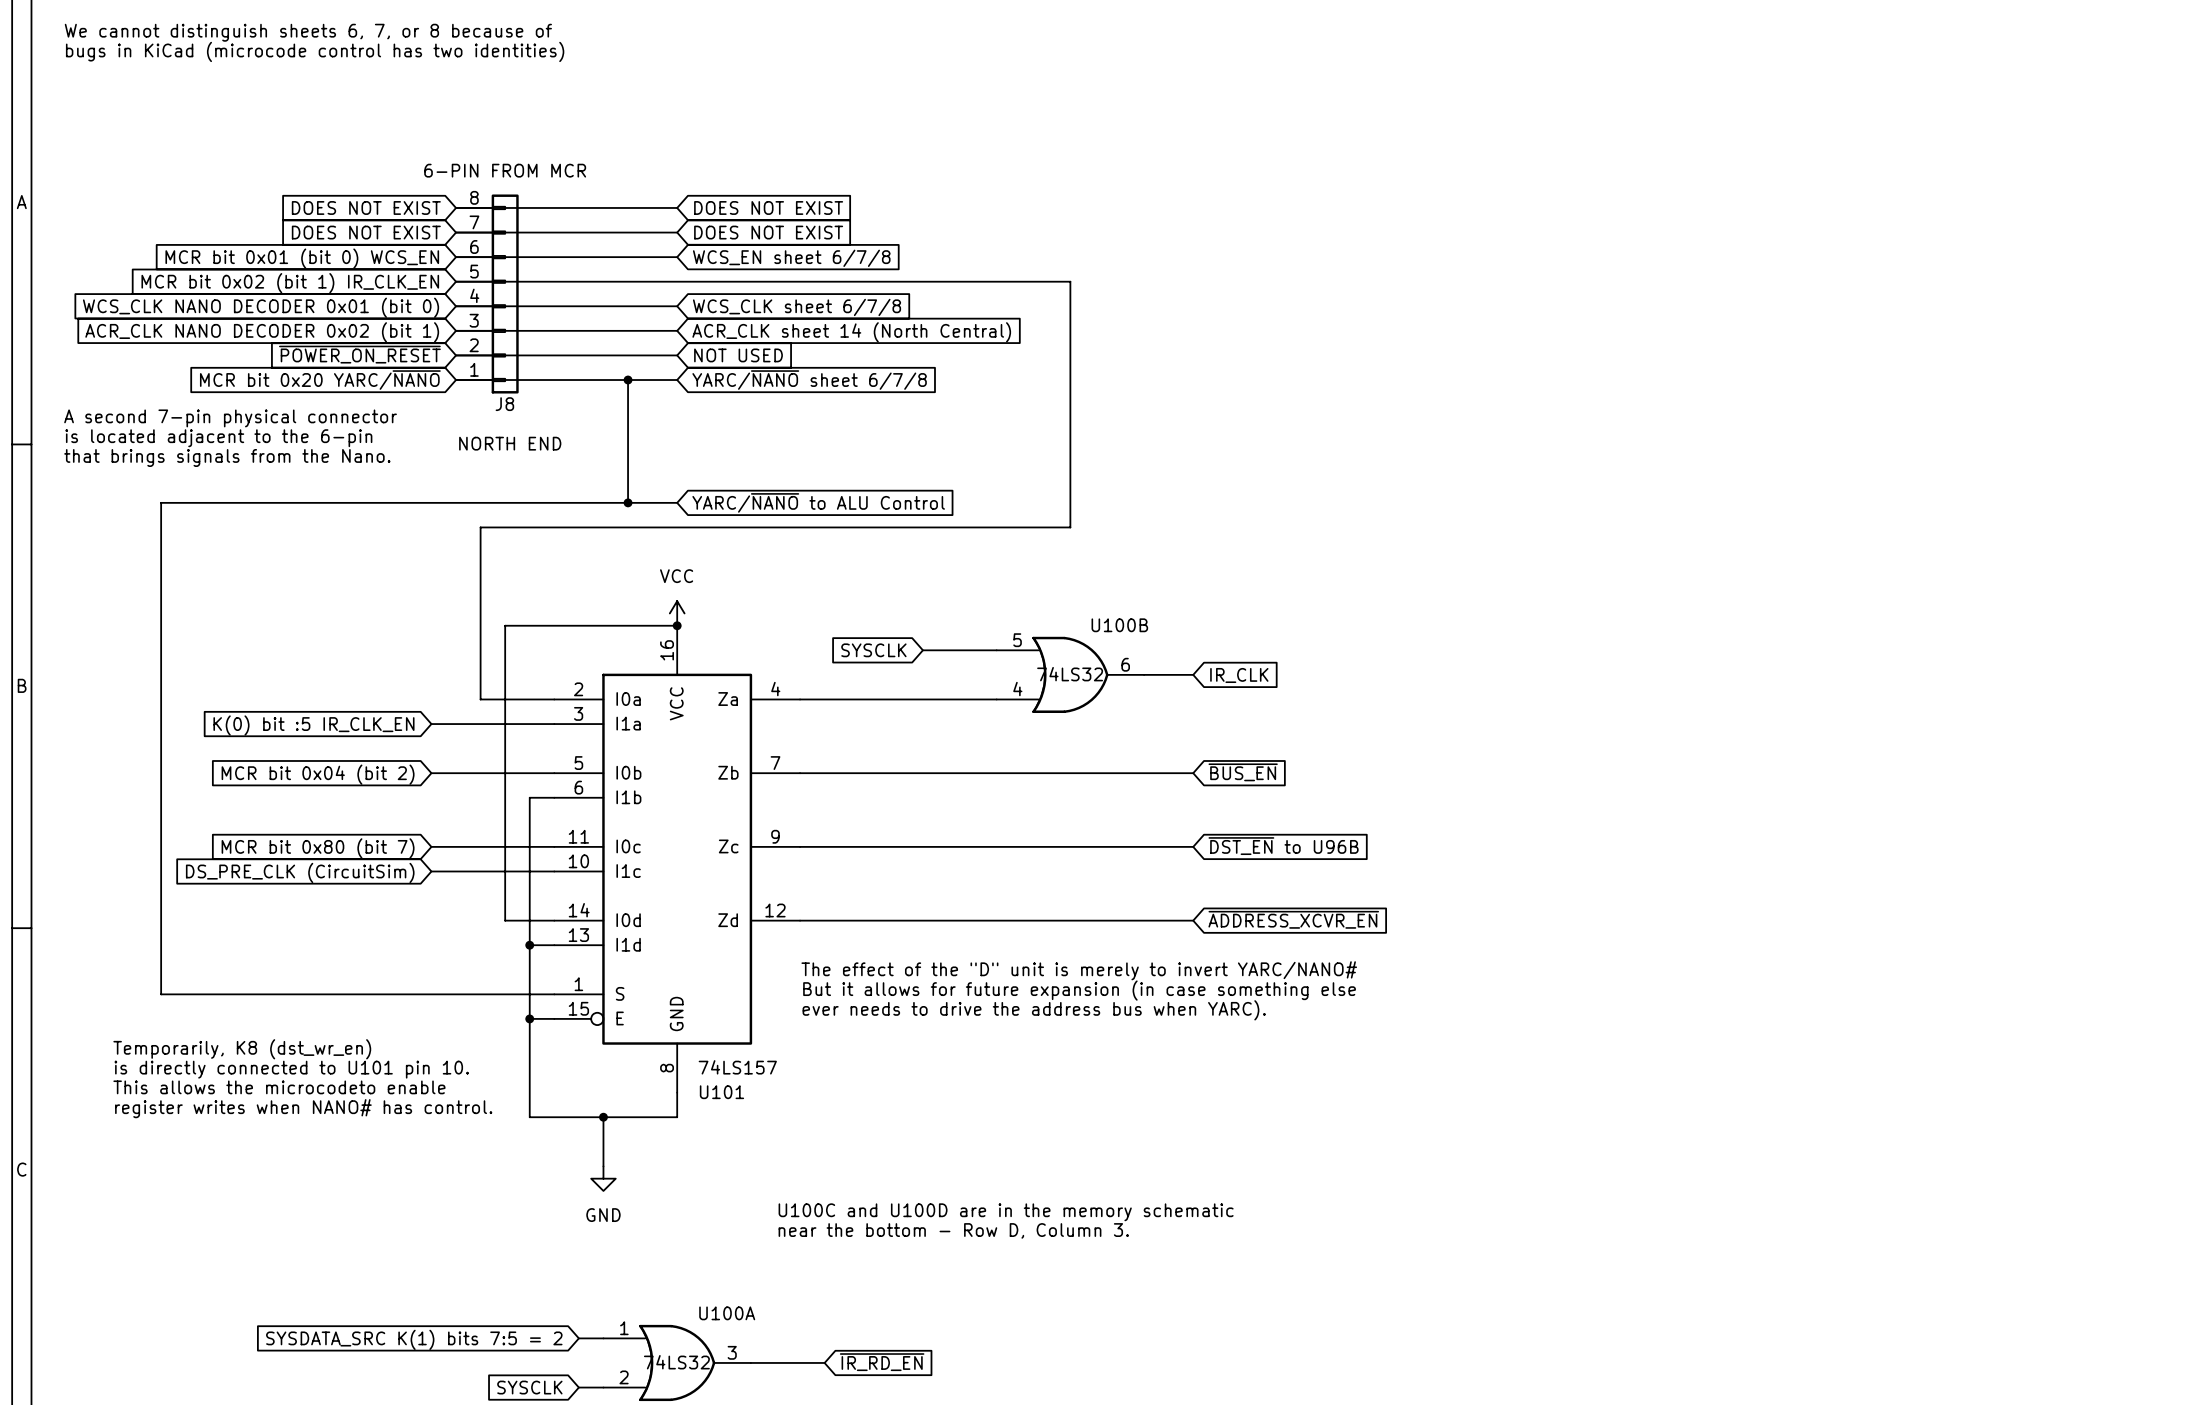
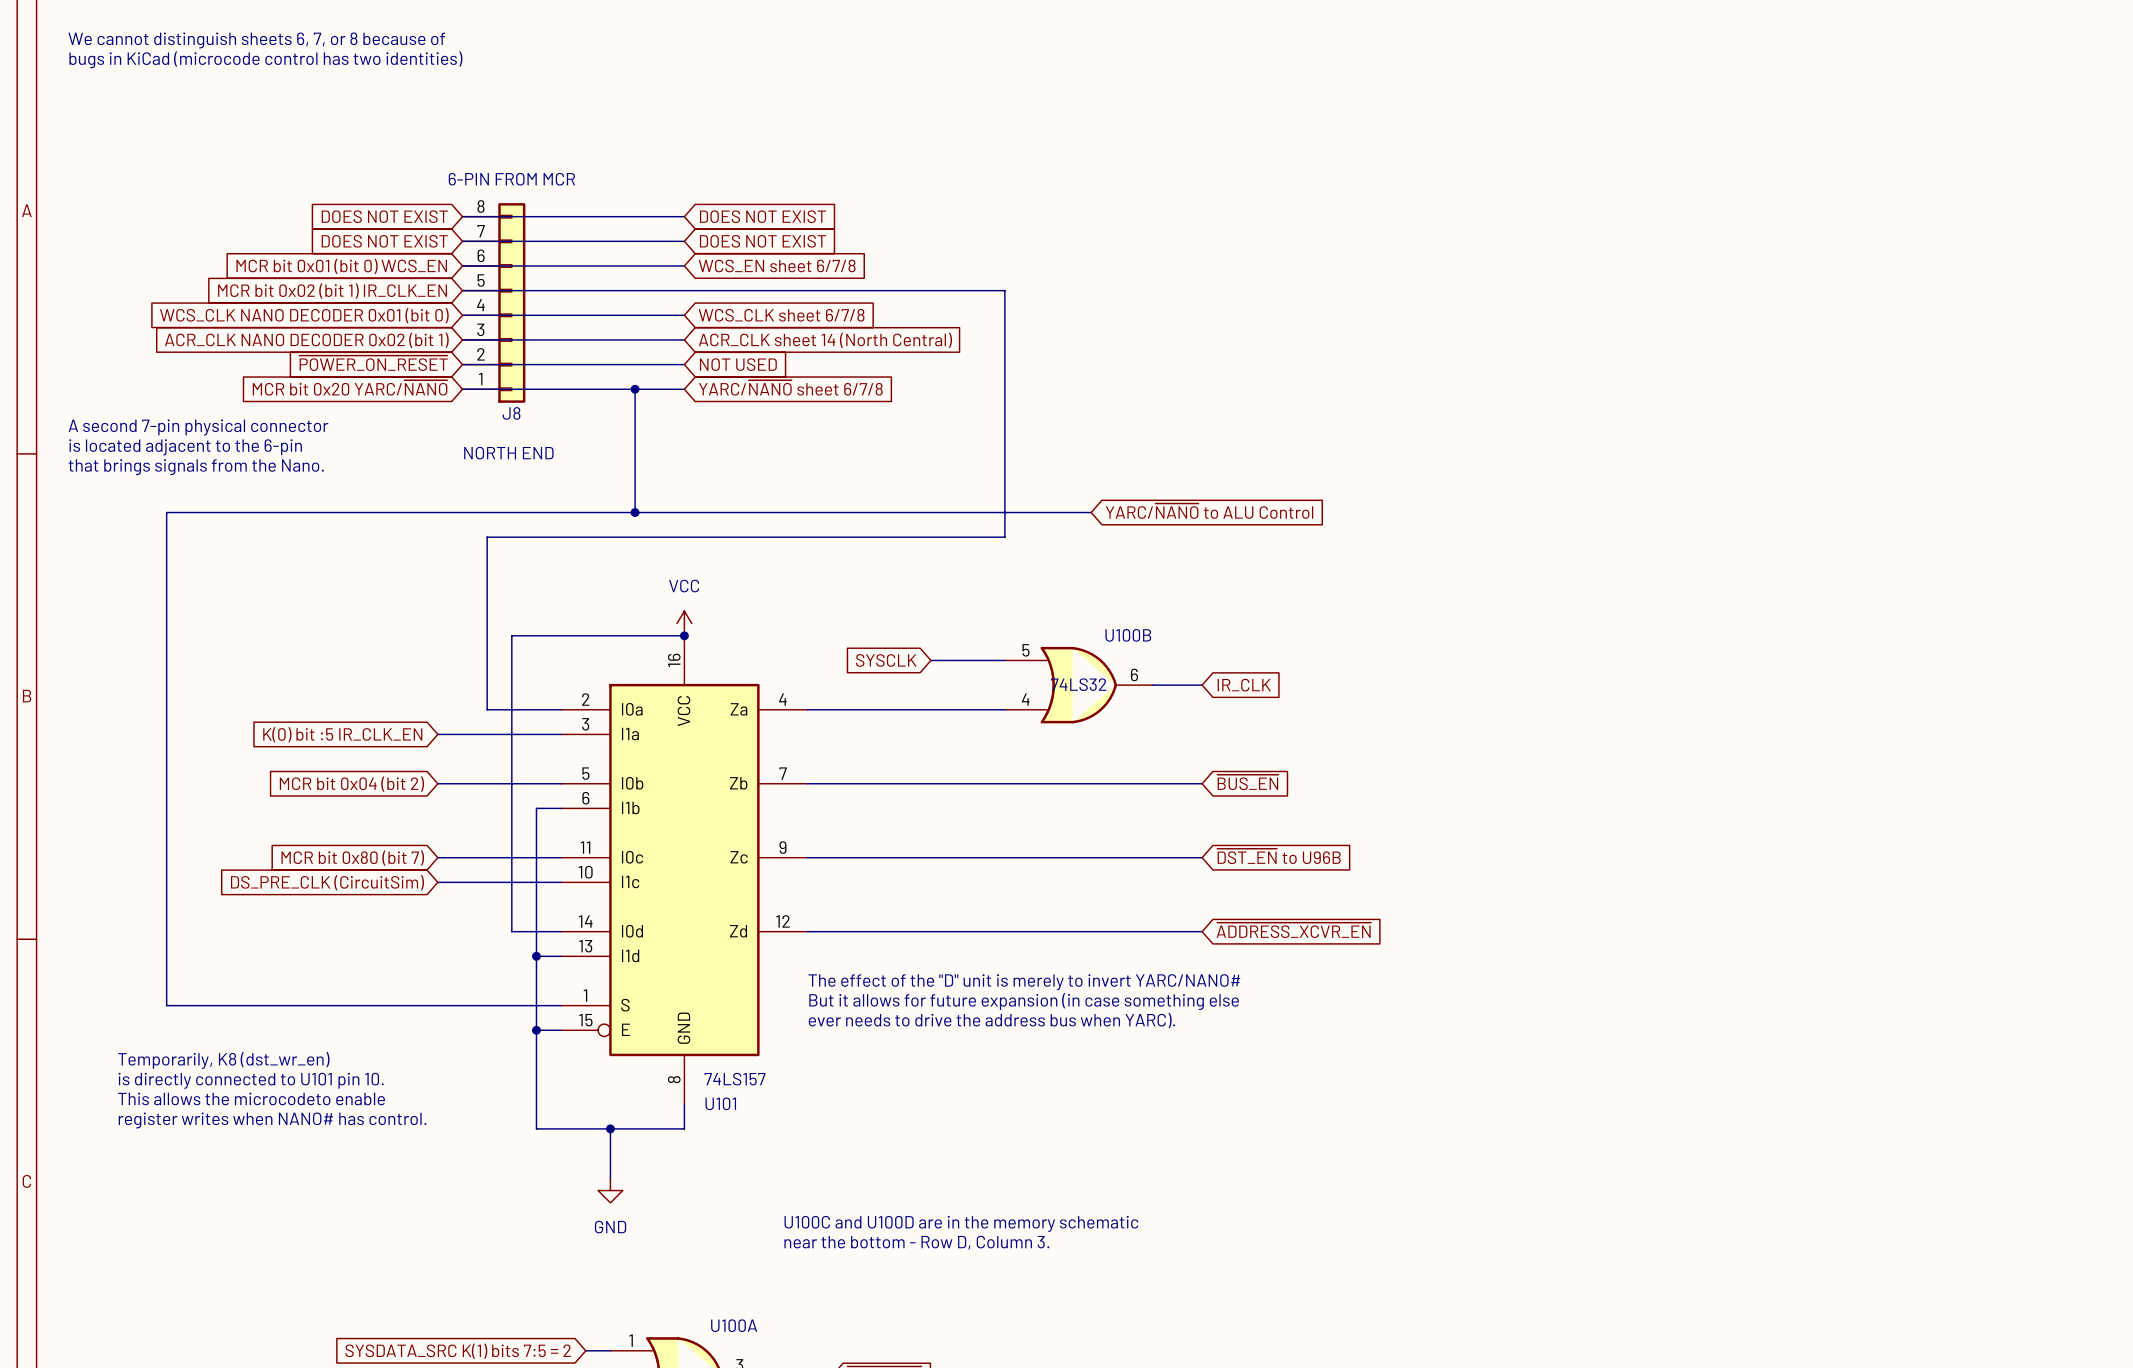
wire: (996, 281) (1070, 281) (1070, 527) (996, 527) -> (1004, 290) (1004, 537)
wire: none -> (684, 512) (1091, 512)
global label: YARC/~{NANO} to ALU Control (818, 502) -> none
global label: none -> YARC/~{NANO} to ALU Control (1209, 511)

